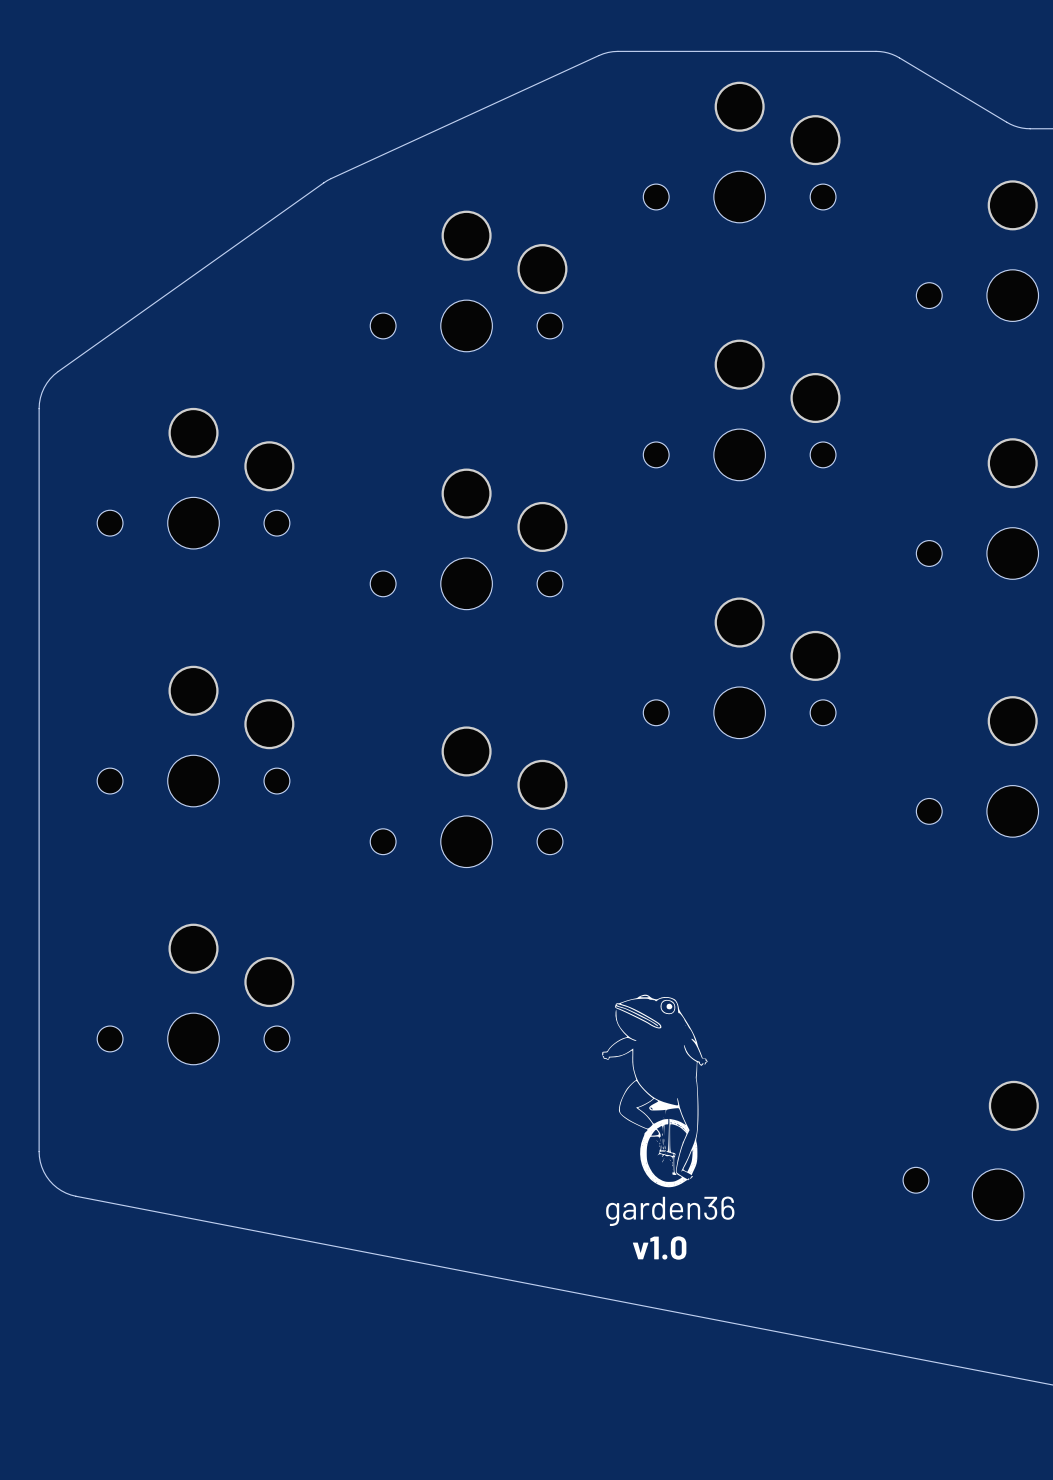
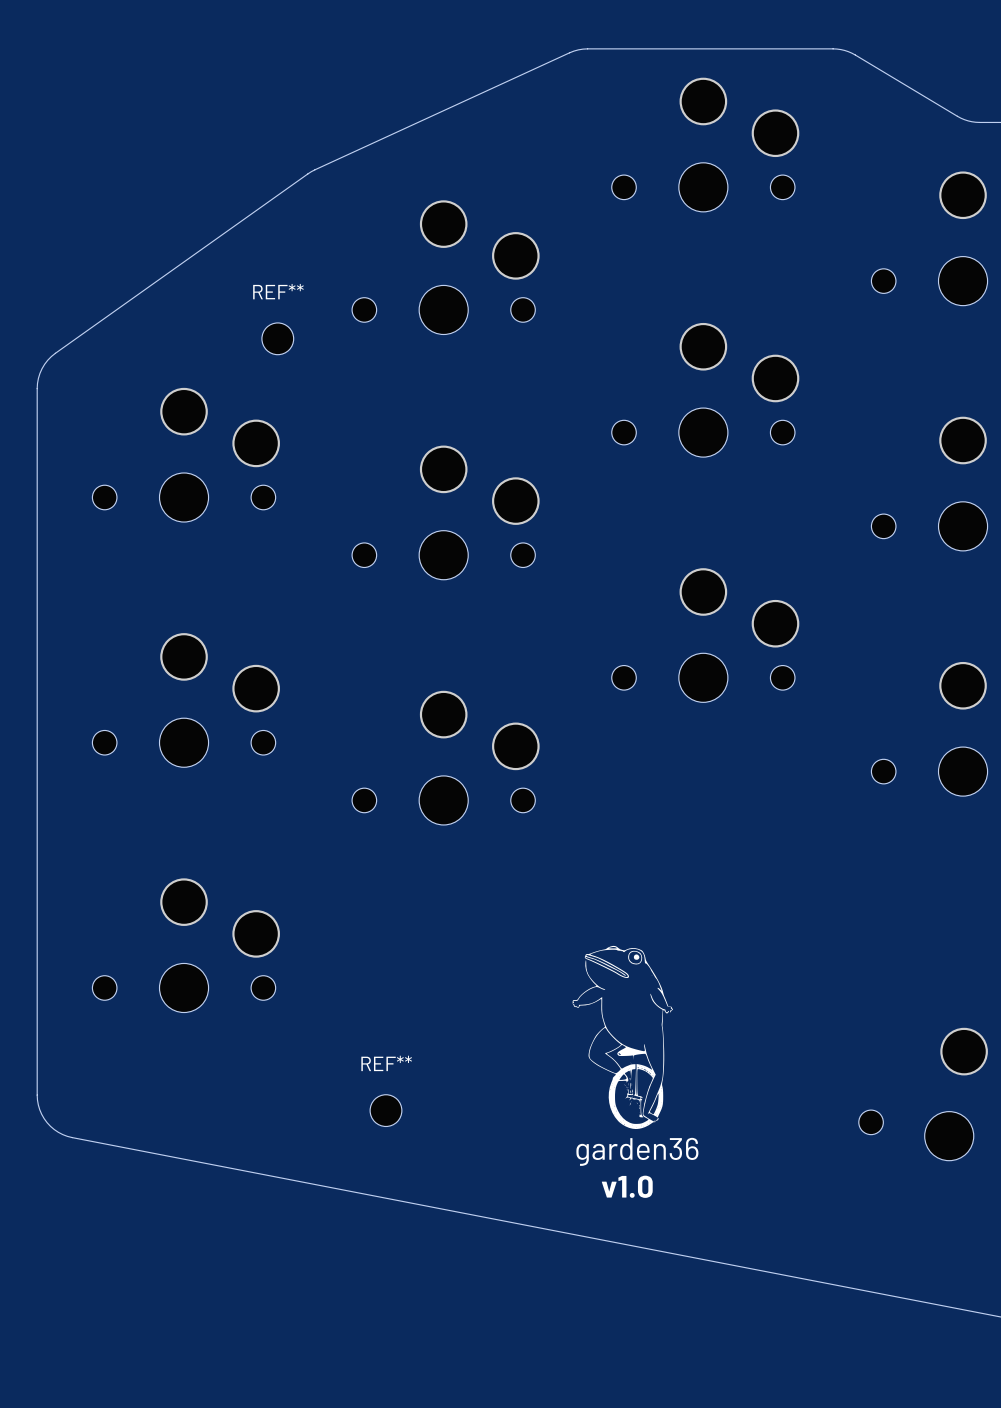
REF**: none -> (277, 338)
REF**: none -> (385, 1110)

